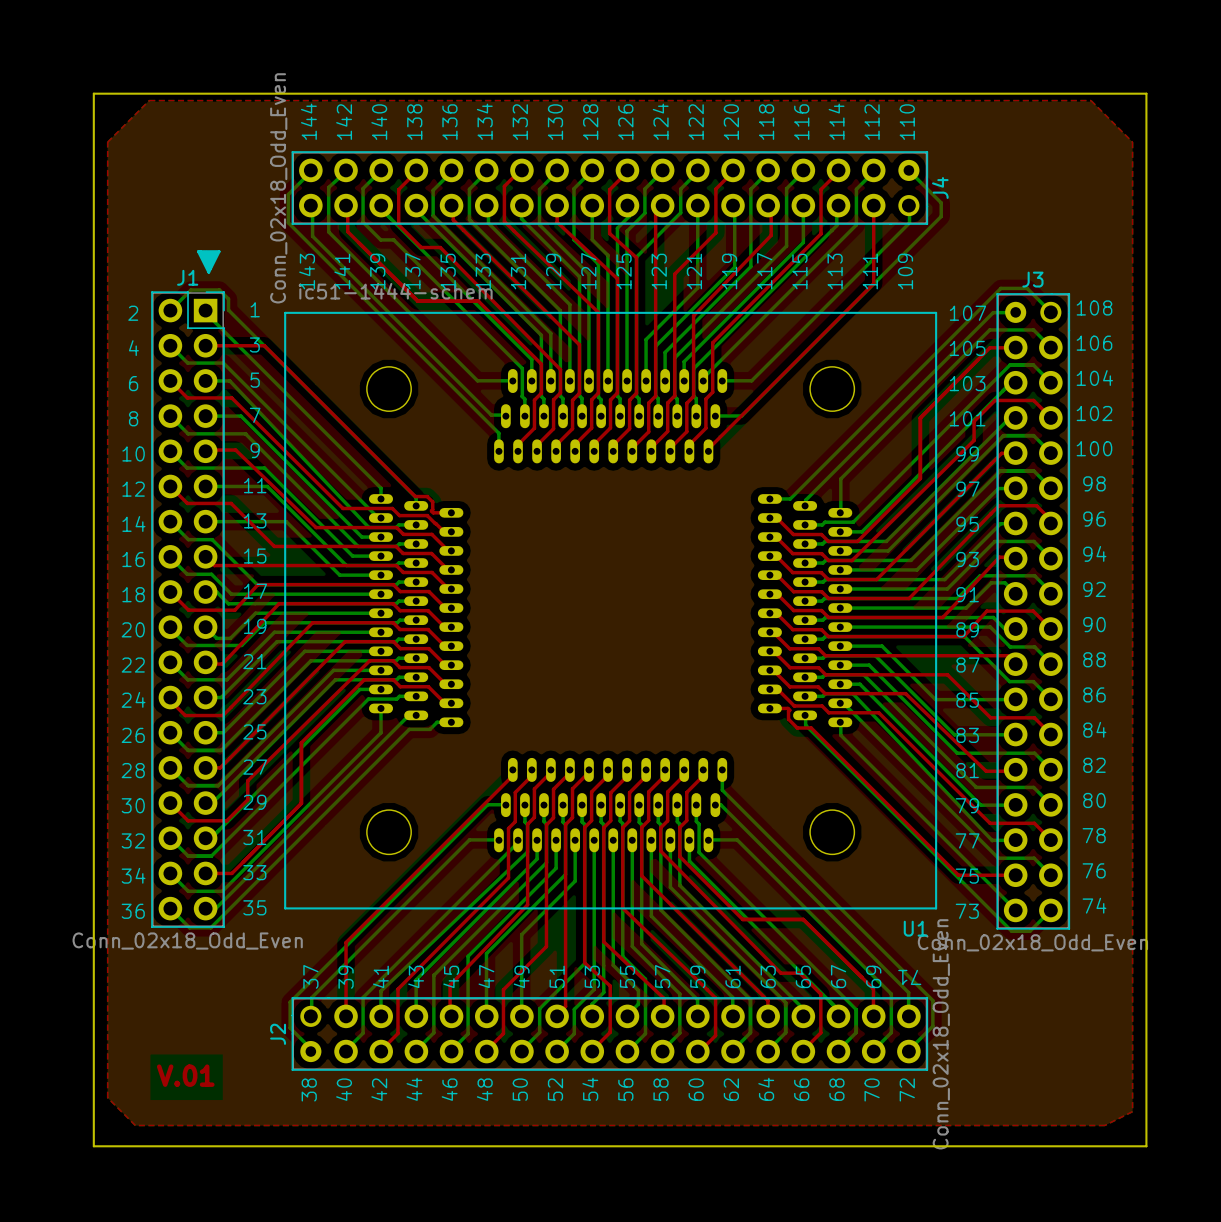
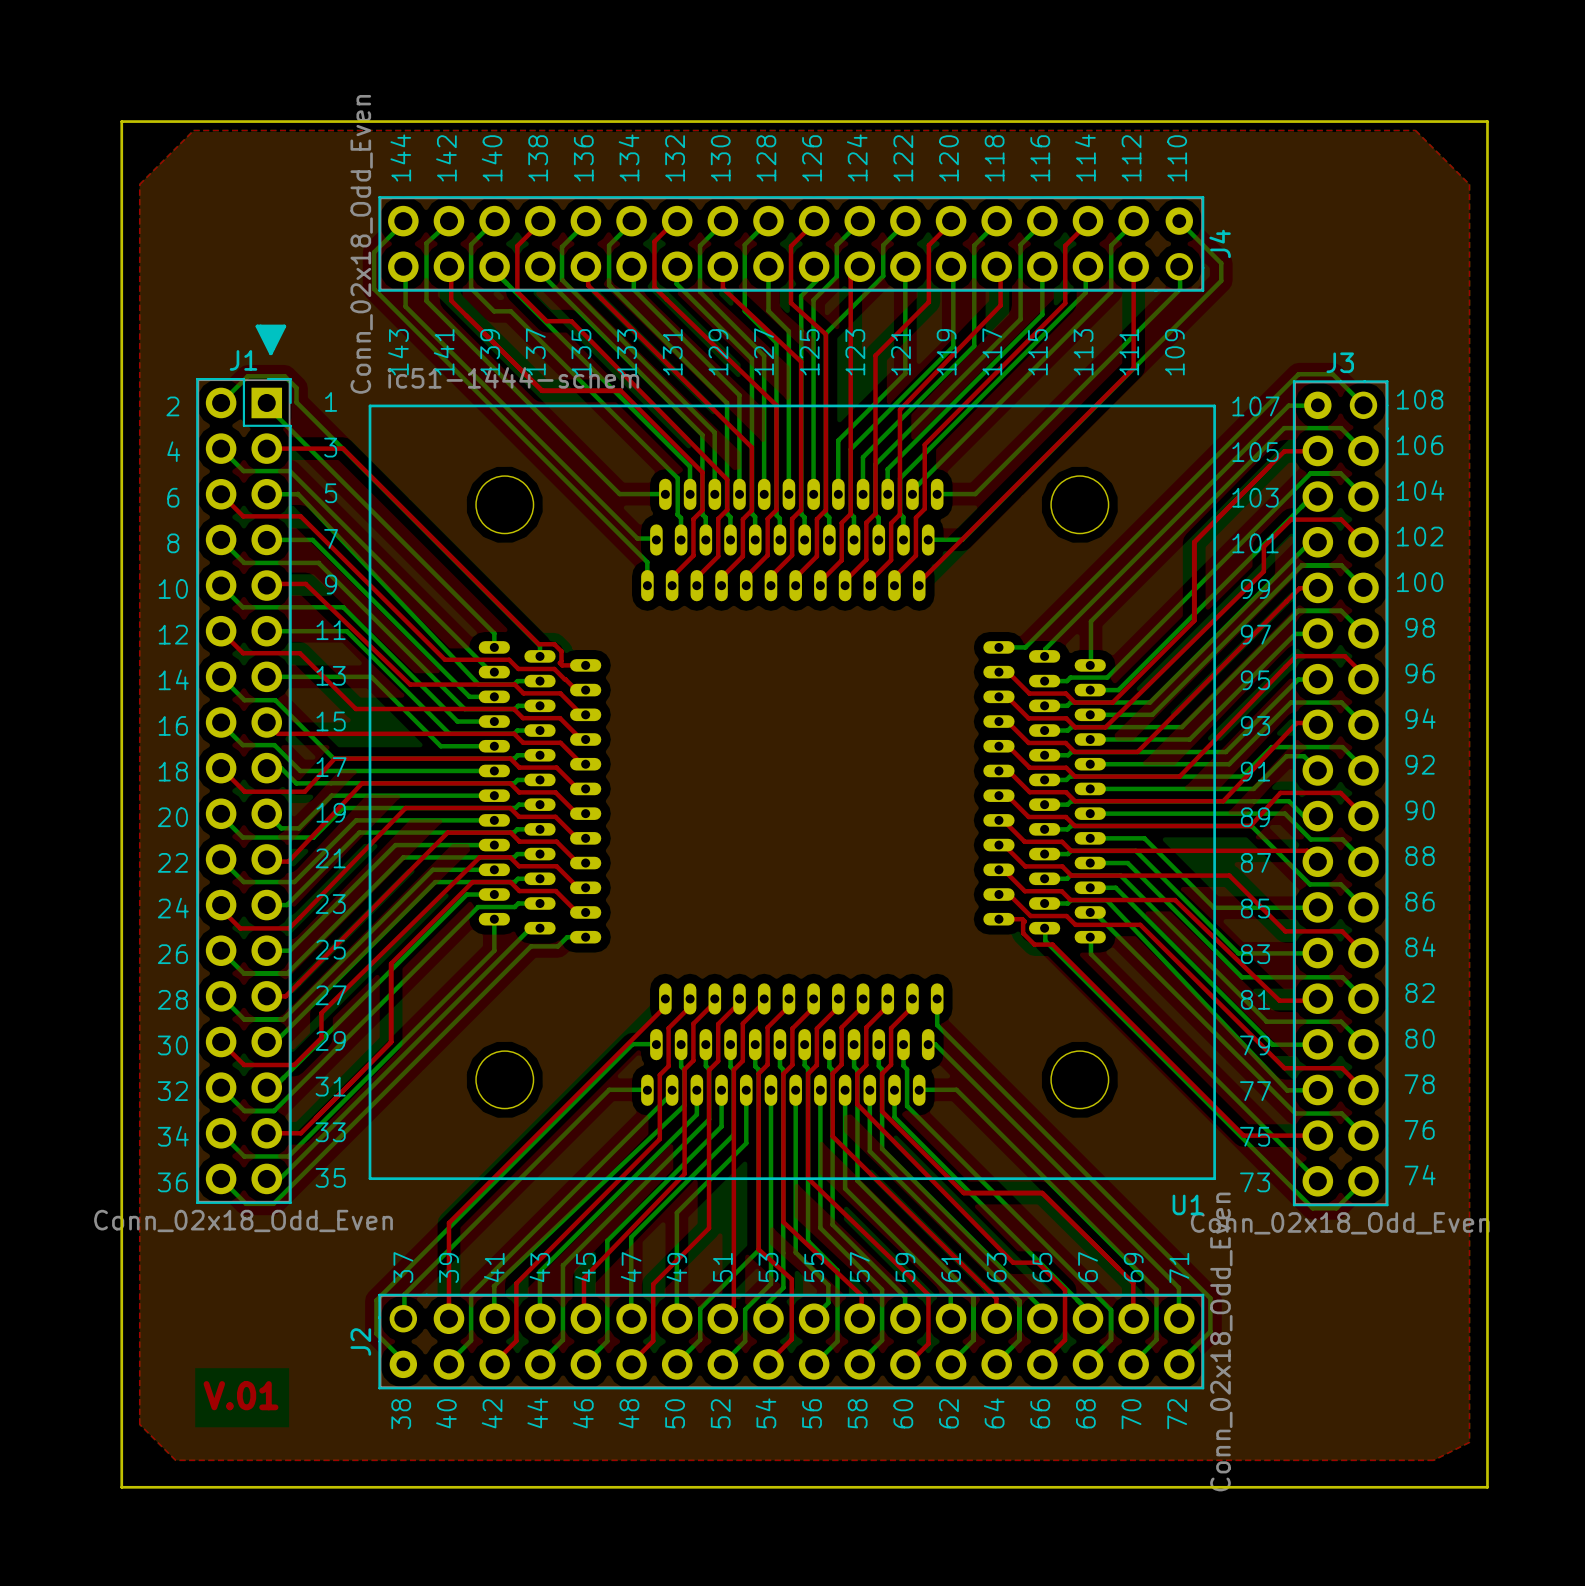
text rotation: 0° (909, 977) -> 90° clockwise (1179, 1267)

